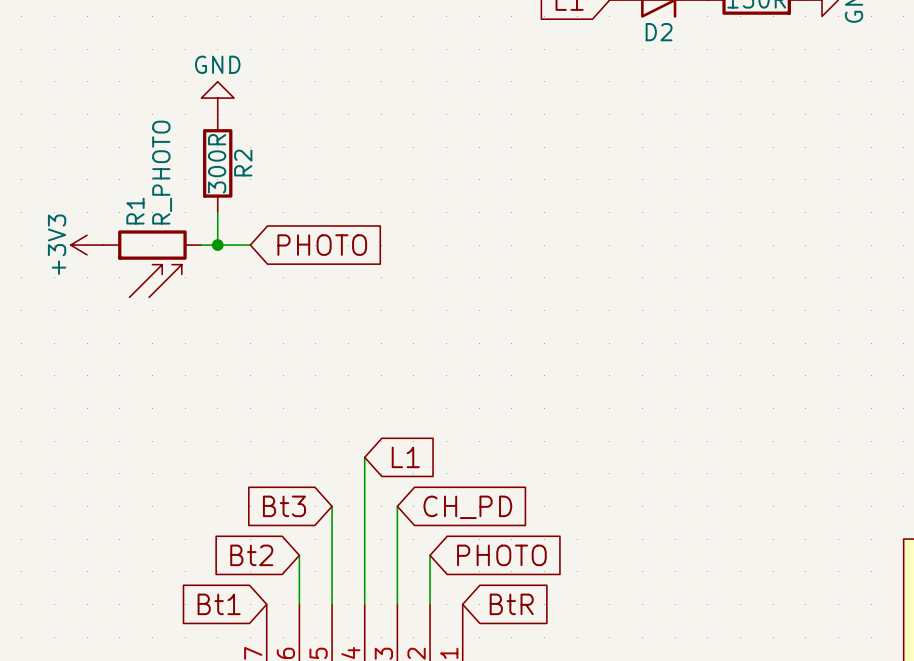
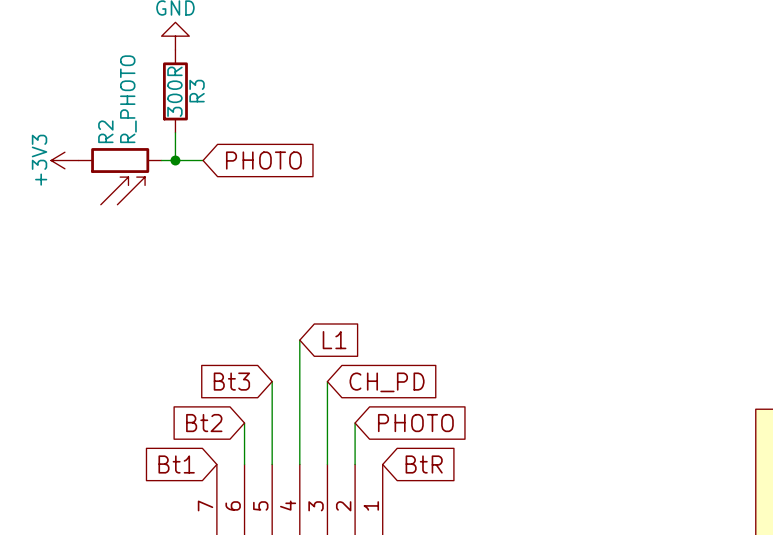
R2 name: R2 (243, 163) -> R3 (197, 91)
R1 name: R1 (135, 211) -> R2 (105, 131)

